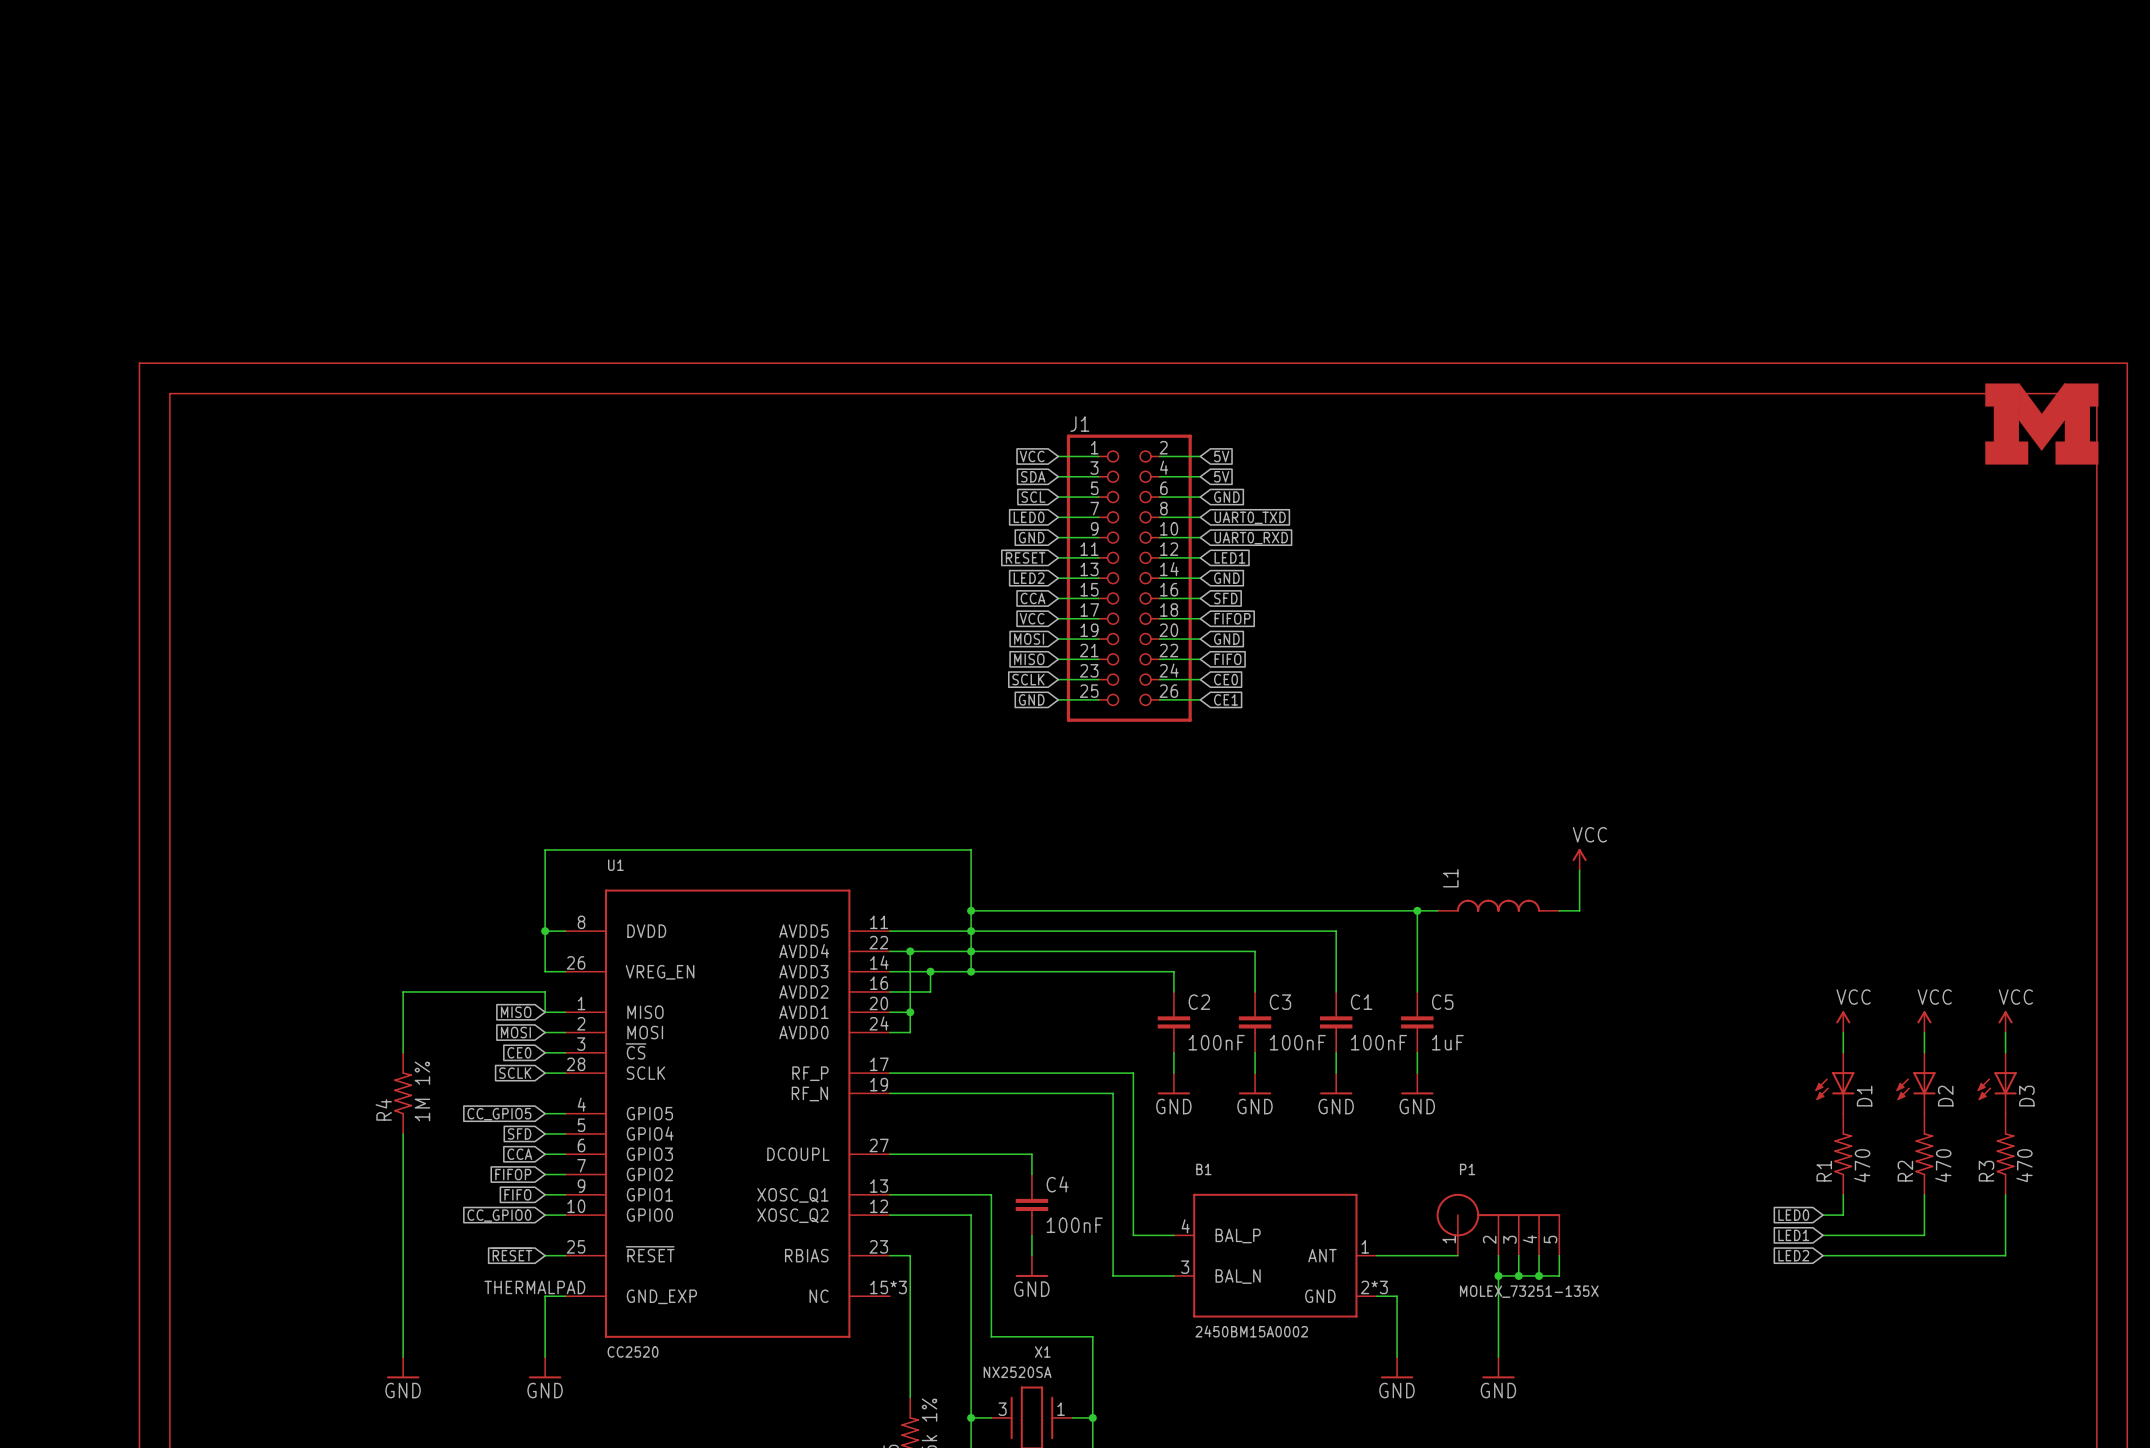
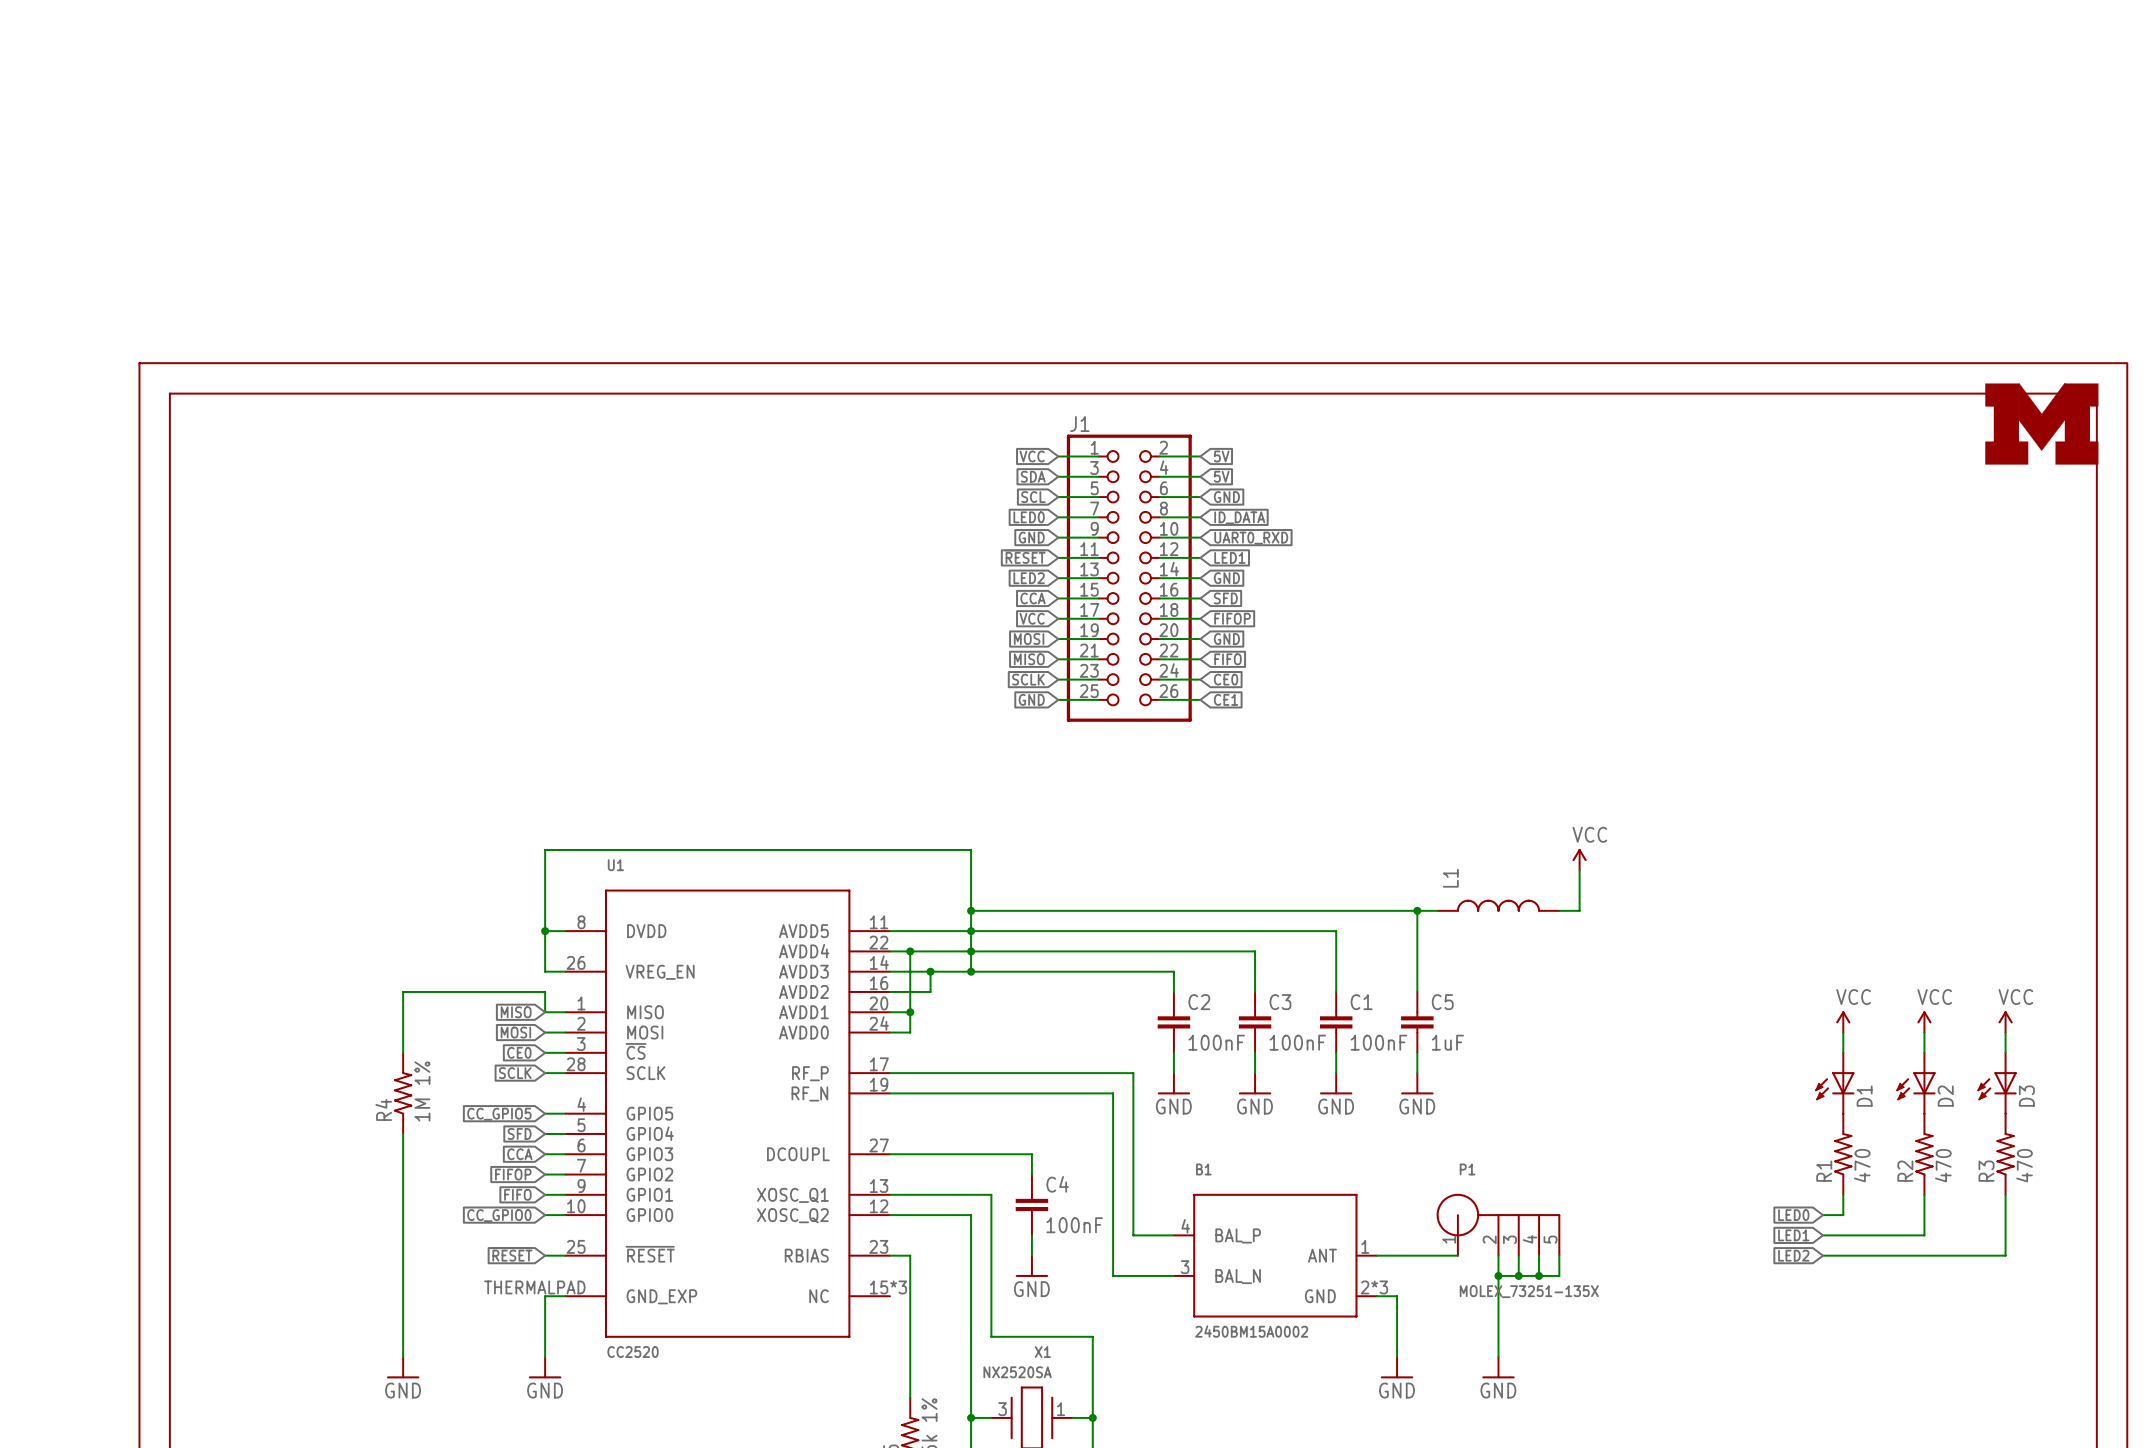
global label: UART0_TXD (1250, 517) -> ID_DATA (1239, 517)

